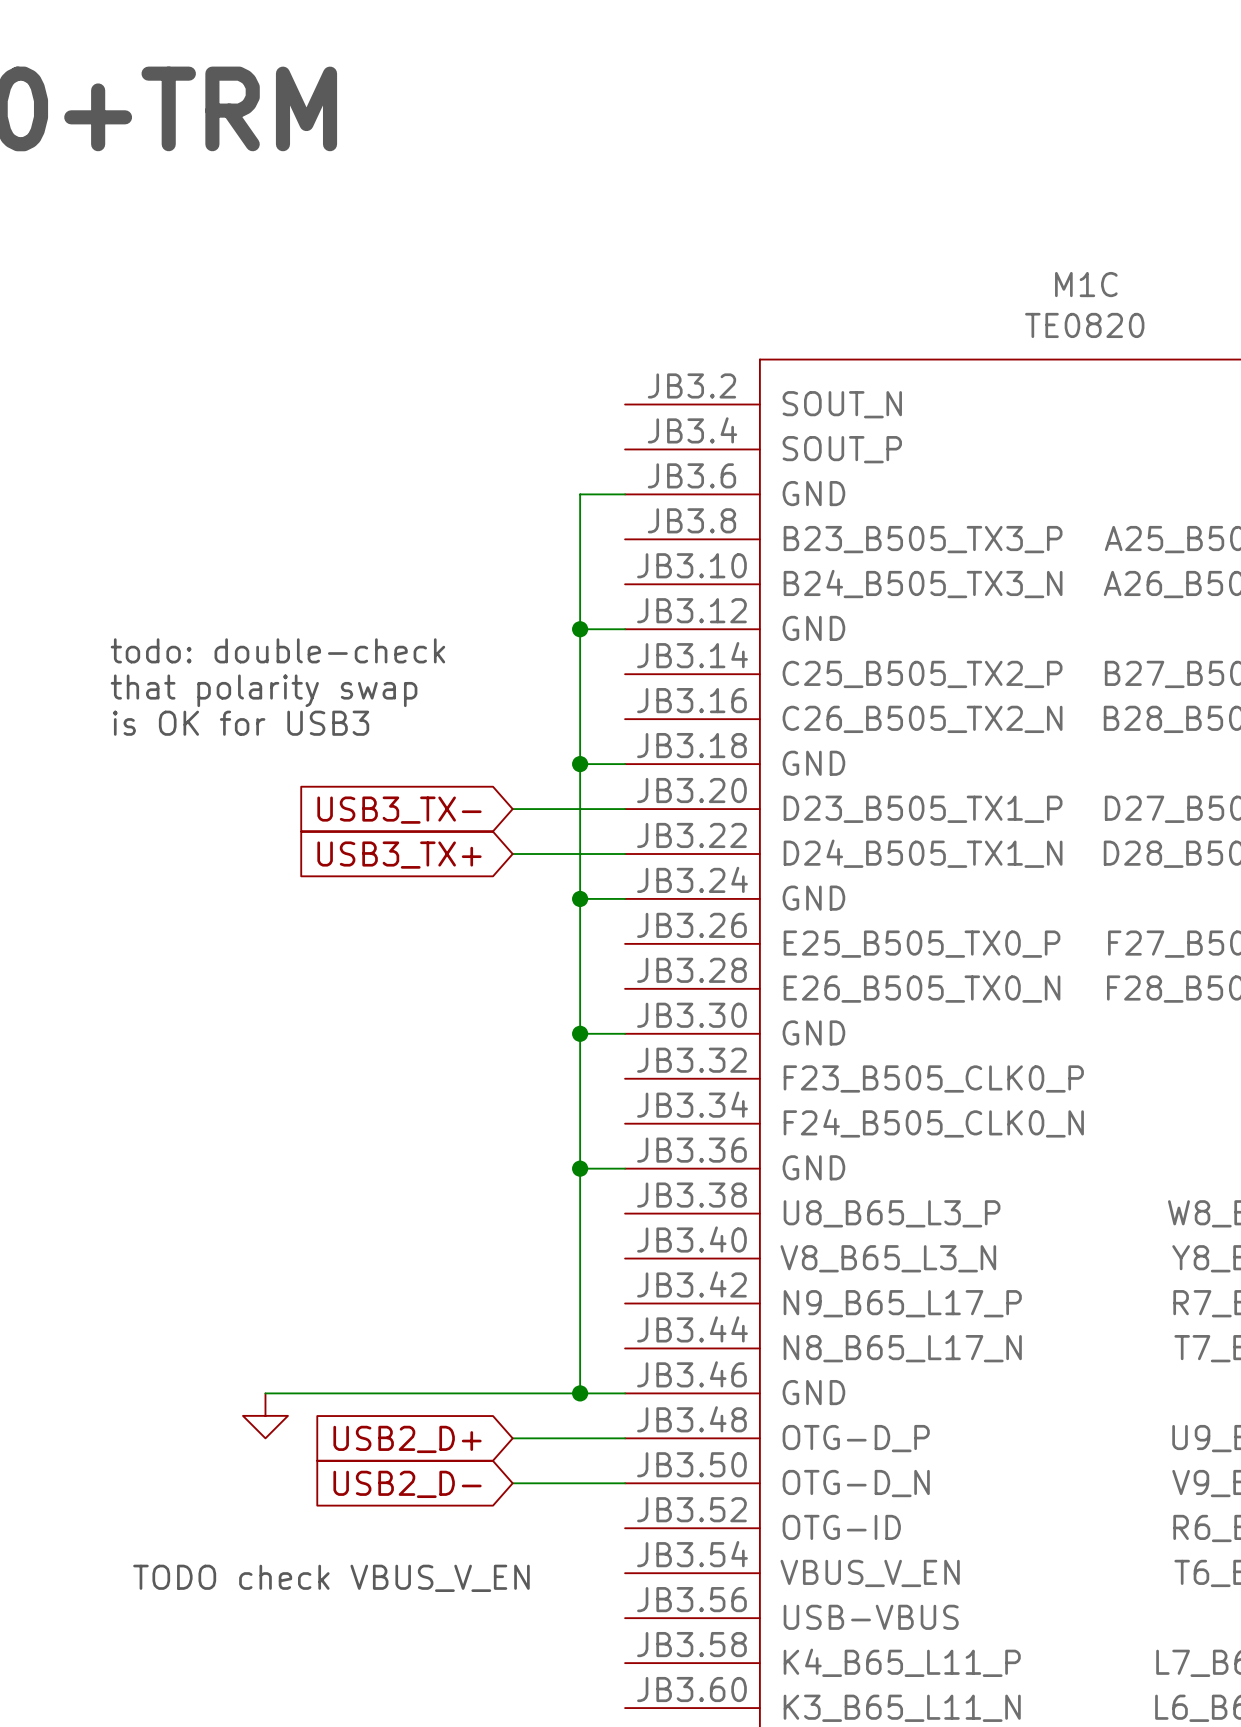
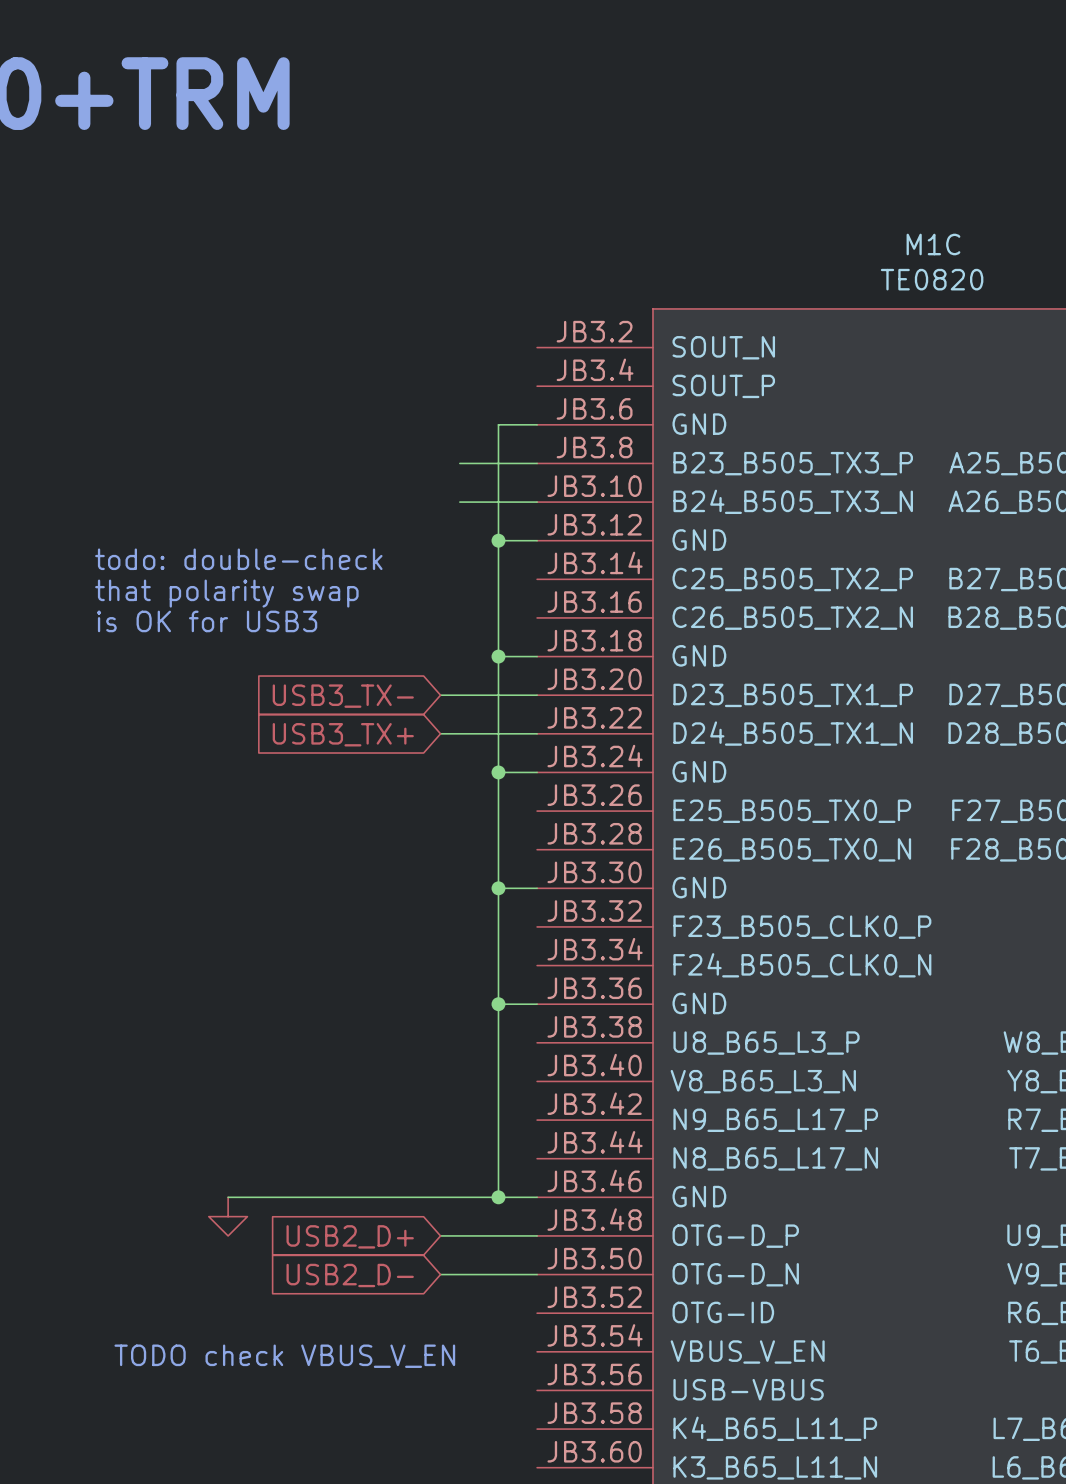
wire: none -> (459, 463) (537, 463)
wire: none -> (459, 502) (537, 502)

